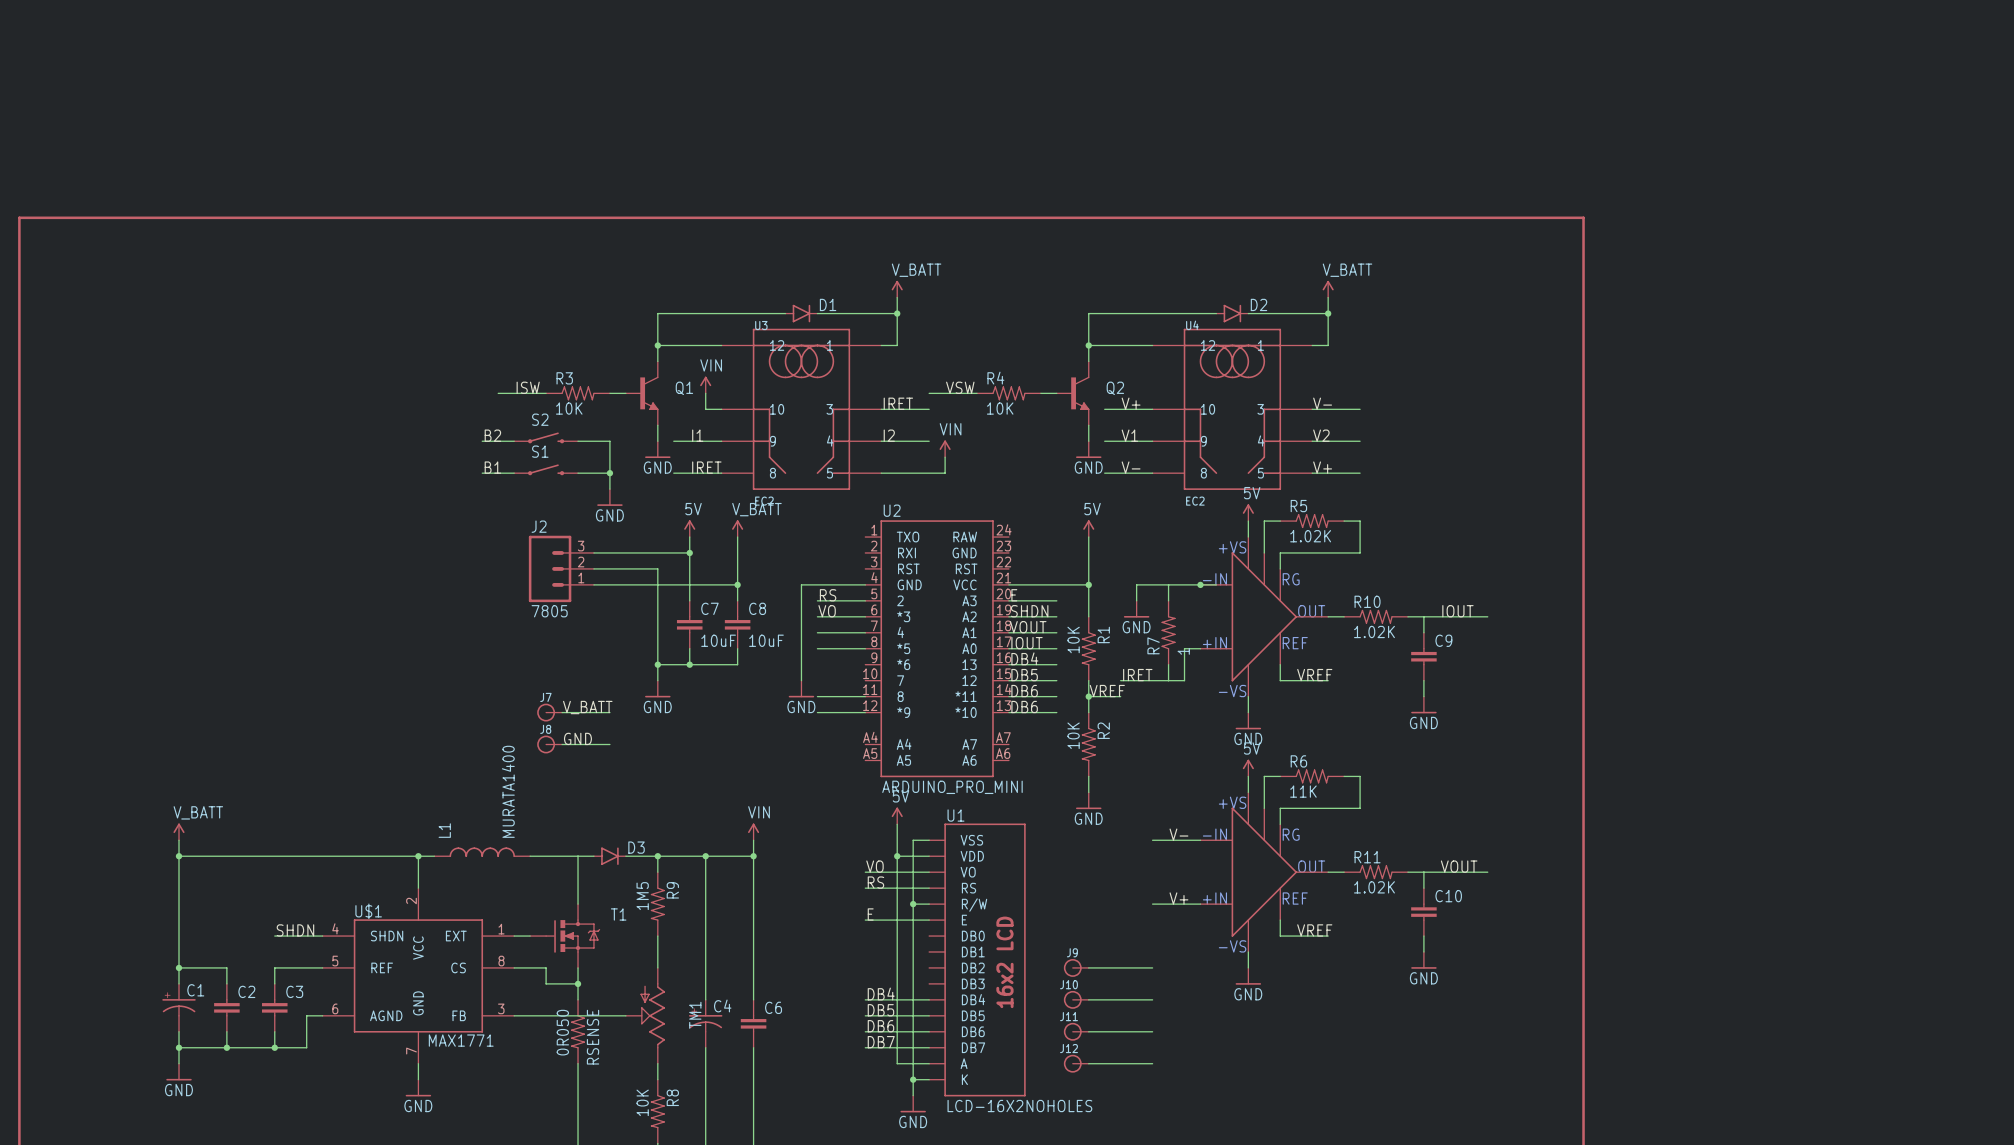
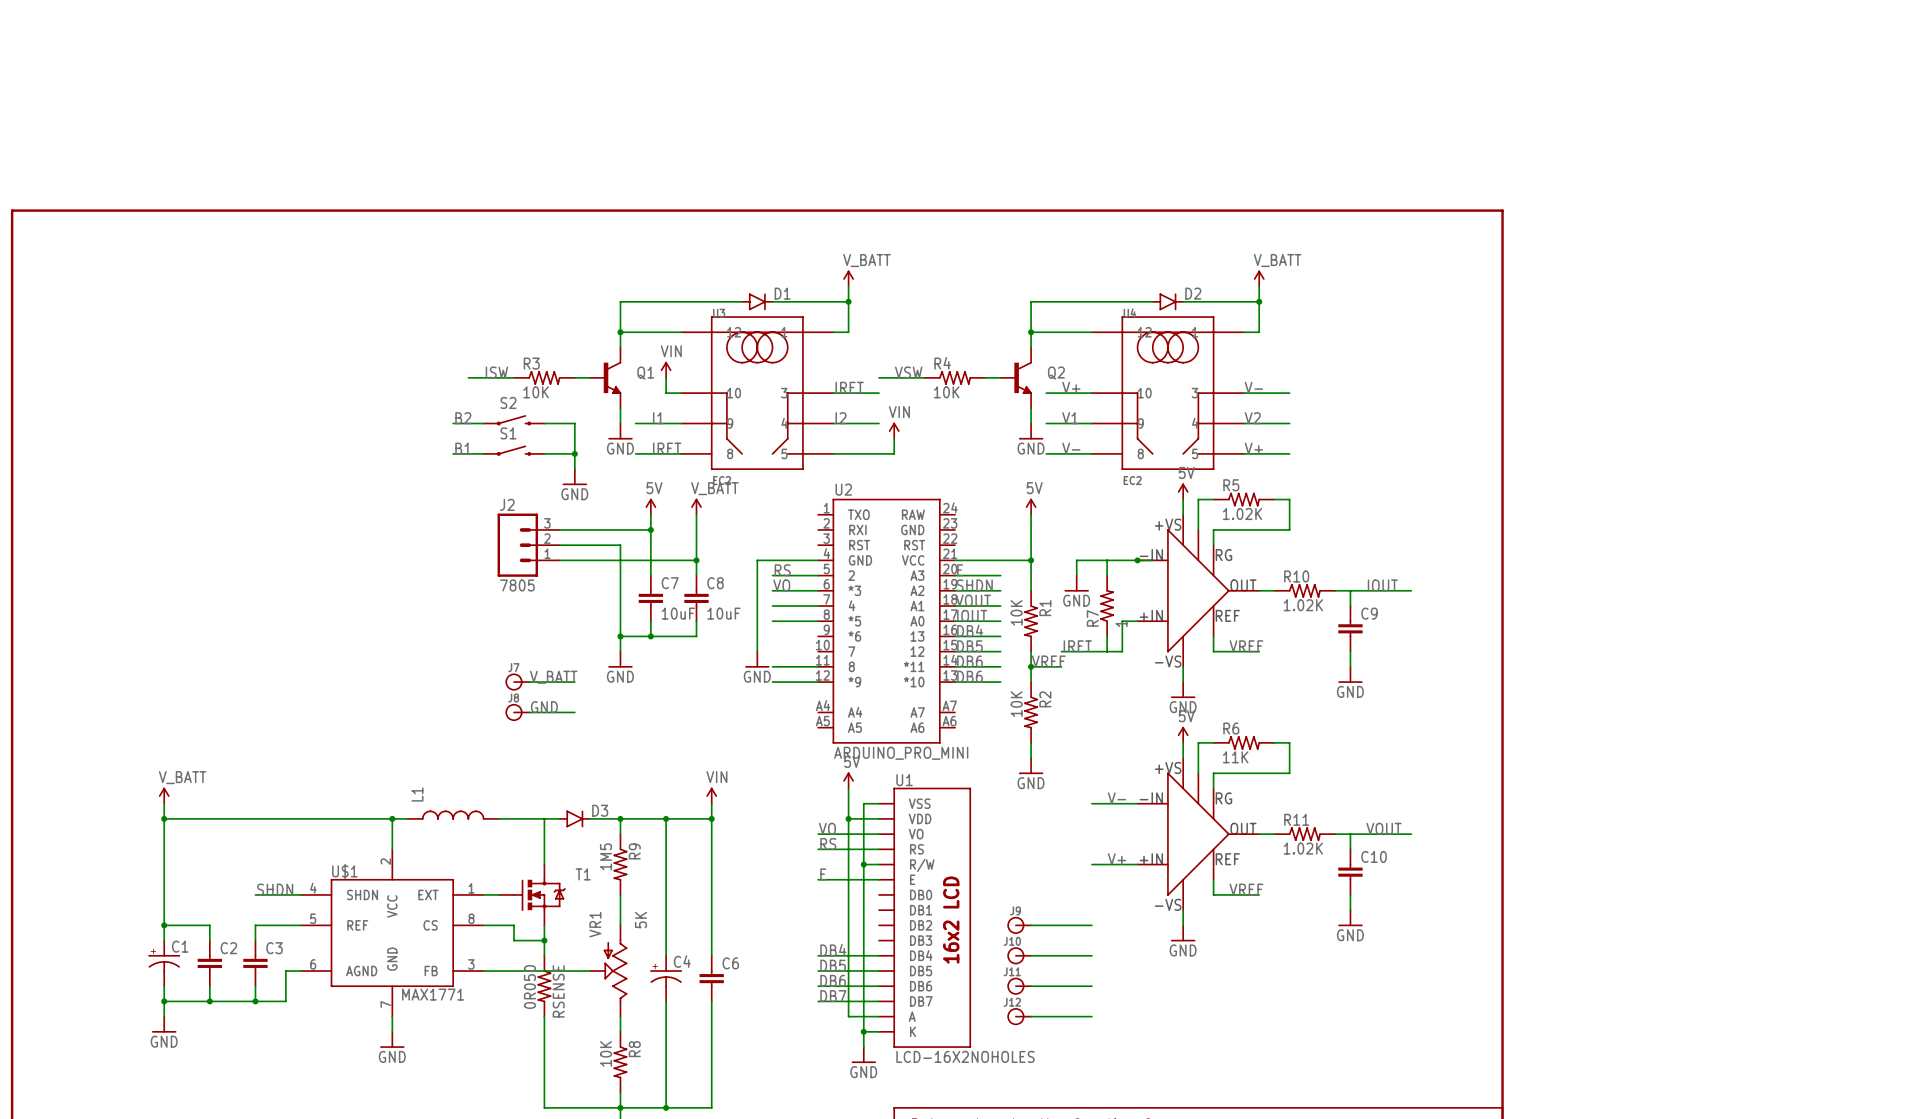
L1 value: MURATA1400 (508, 791) -> none
TM1 value: none -> 5K (640, 920)
TM1 name: TM1 (695, 1015) -> VR1 (595, 924)

